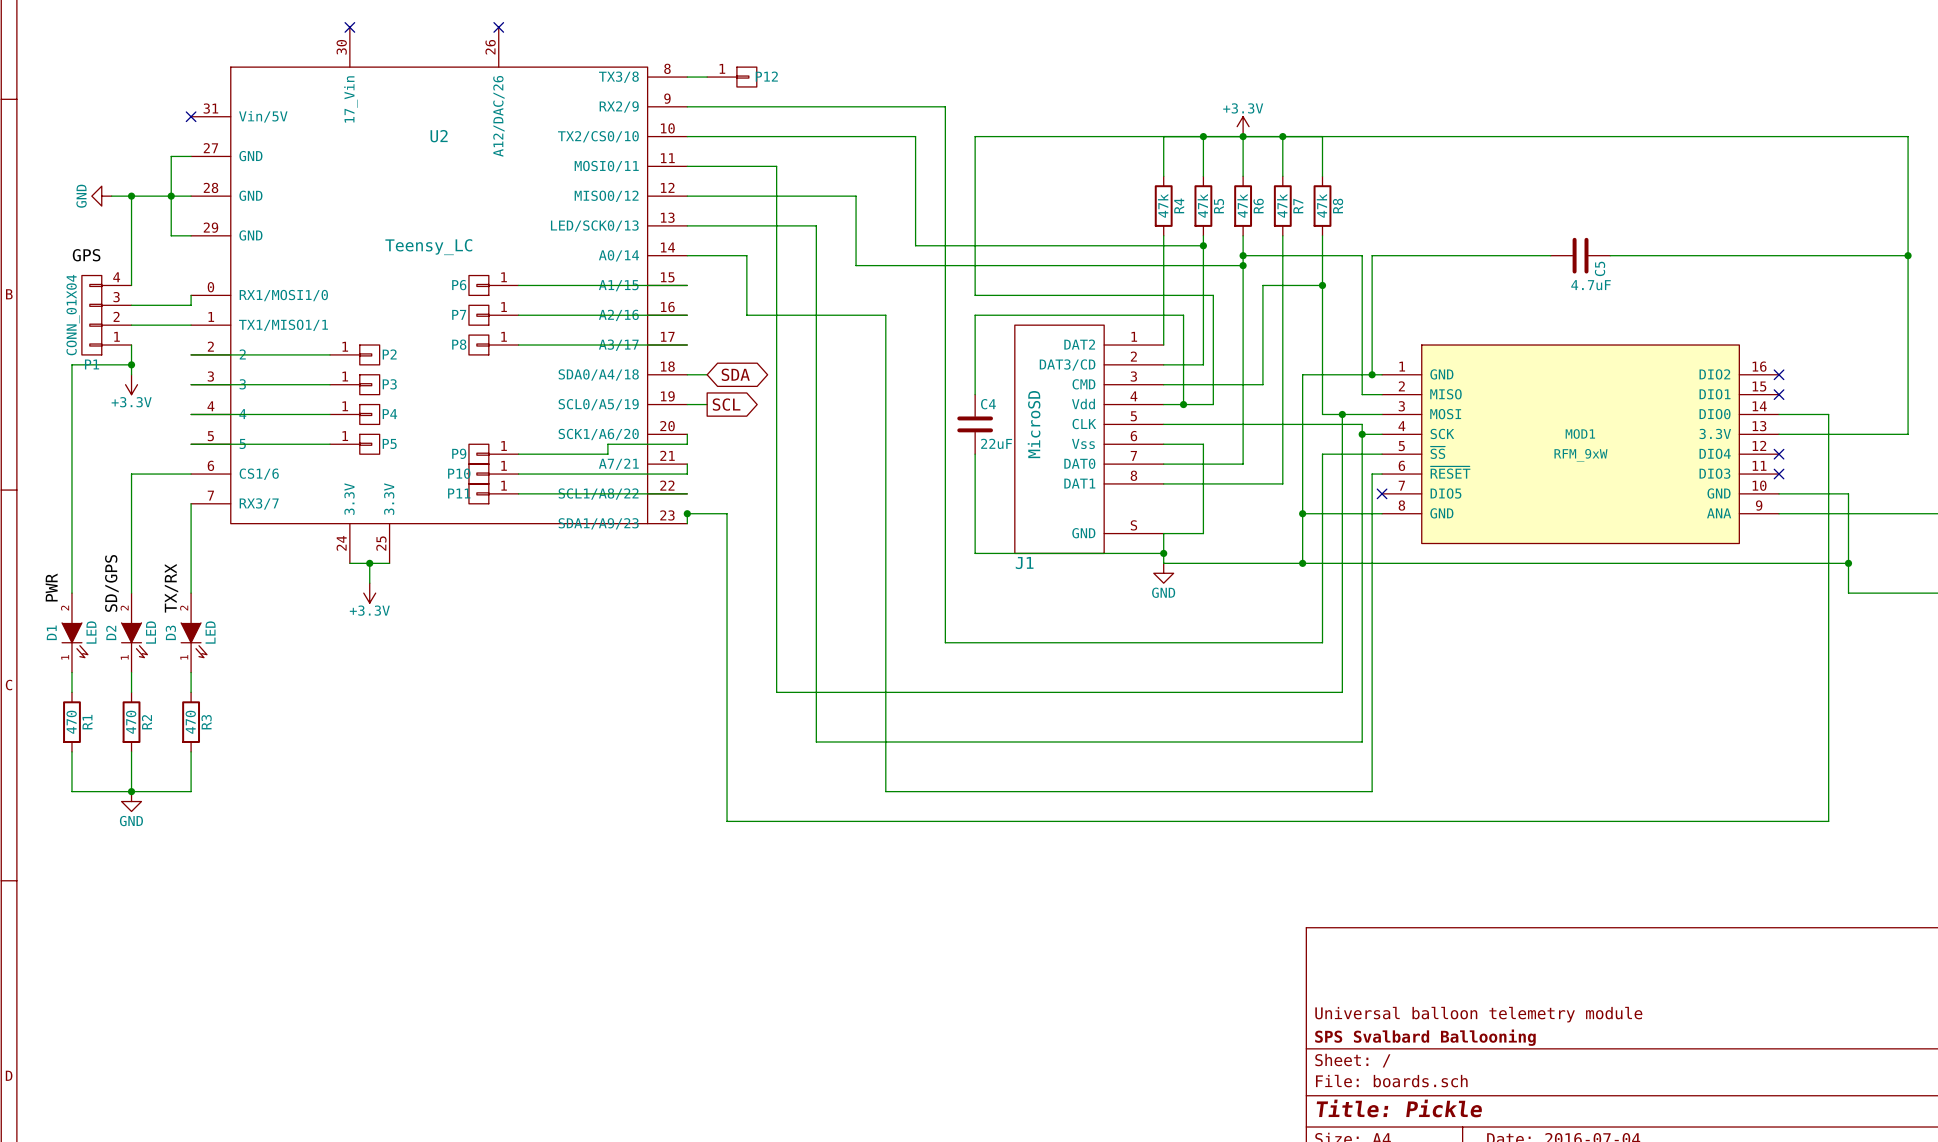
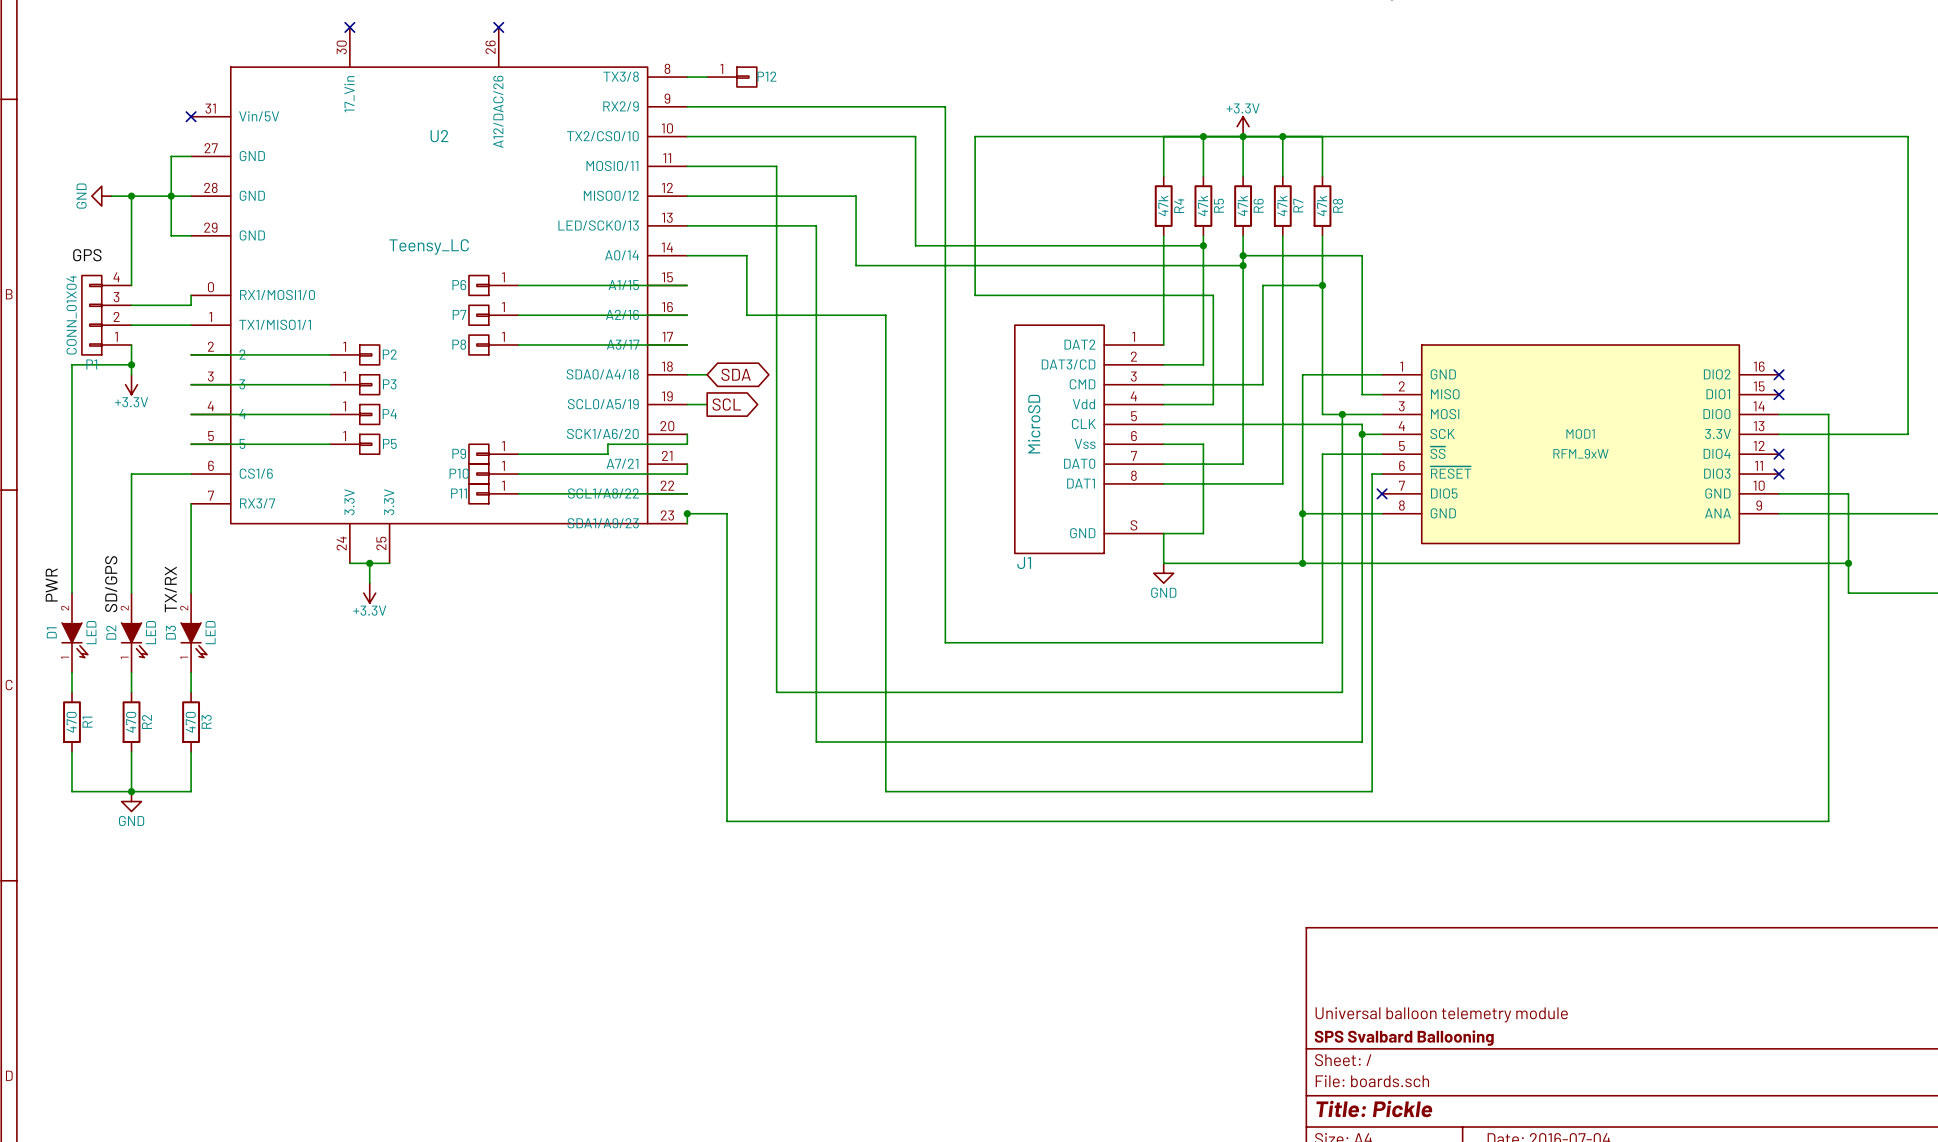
wire: (1550, 255) (1372, 255) (1372, 374) -> none
C5: 4.7uF (1580, 255) -> none
wire: (1610, 255) (1908, 255) -> none
junction: (1908, 255) -> none
junction: (1372, 374) -> none
wire: (975, 394) (975, 315) (1183, 315) (1183, 404) -> none
junction: (1183, 404) -> none
C4: 22uF (975, 424) -> none
wire: (975, 454) (975, 553) (1163, 553) -> none
junction: (1163, 553) -> none

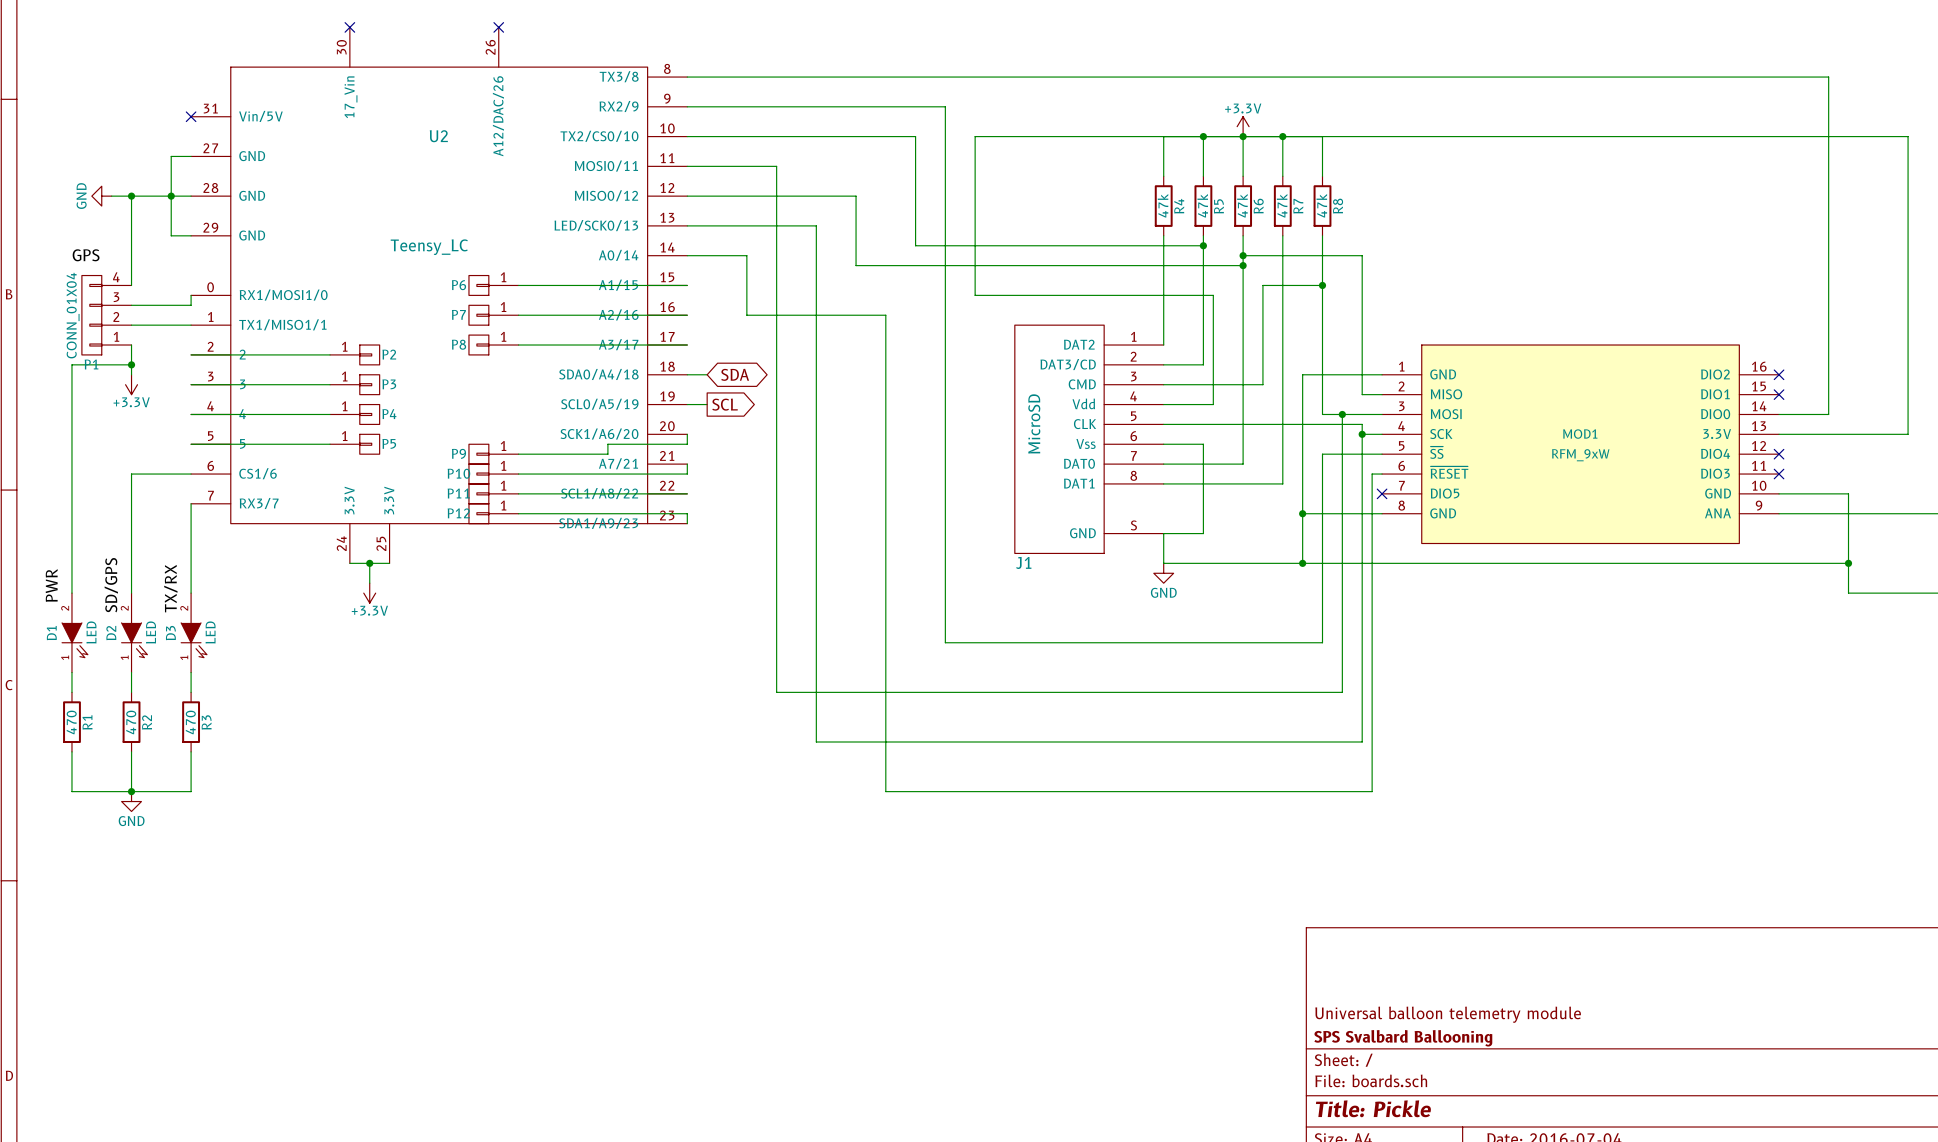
P12 position: (731, 77) -> (493, 513)
P12 rotation: 0° (746, 77) -> 180° (478, 513)
wire: (1828, 414) (1828, 821) (727, 821) (727, 513) (687, 513) -> (1828, 414) (1828, 77) (707, 77)
wire: none -> (518, 513) (687, 513)
junction: (687, 513) -> none

